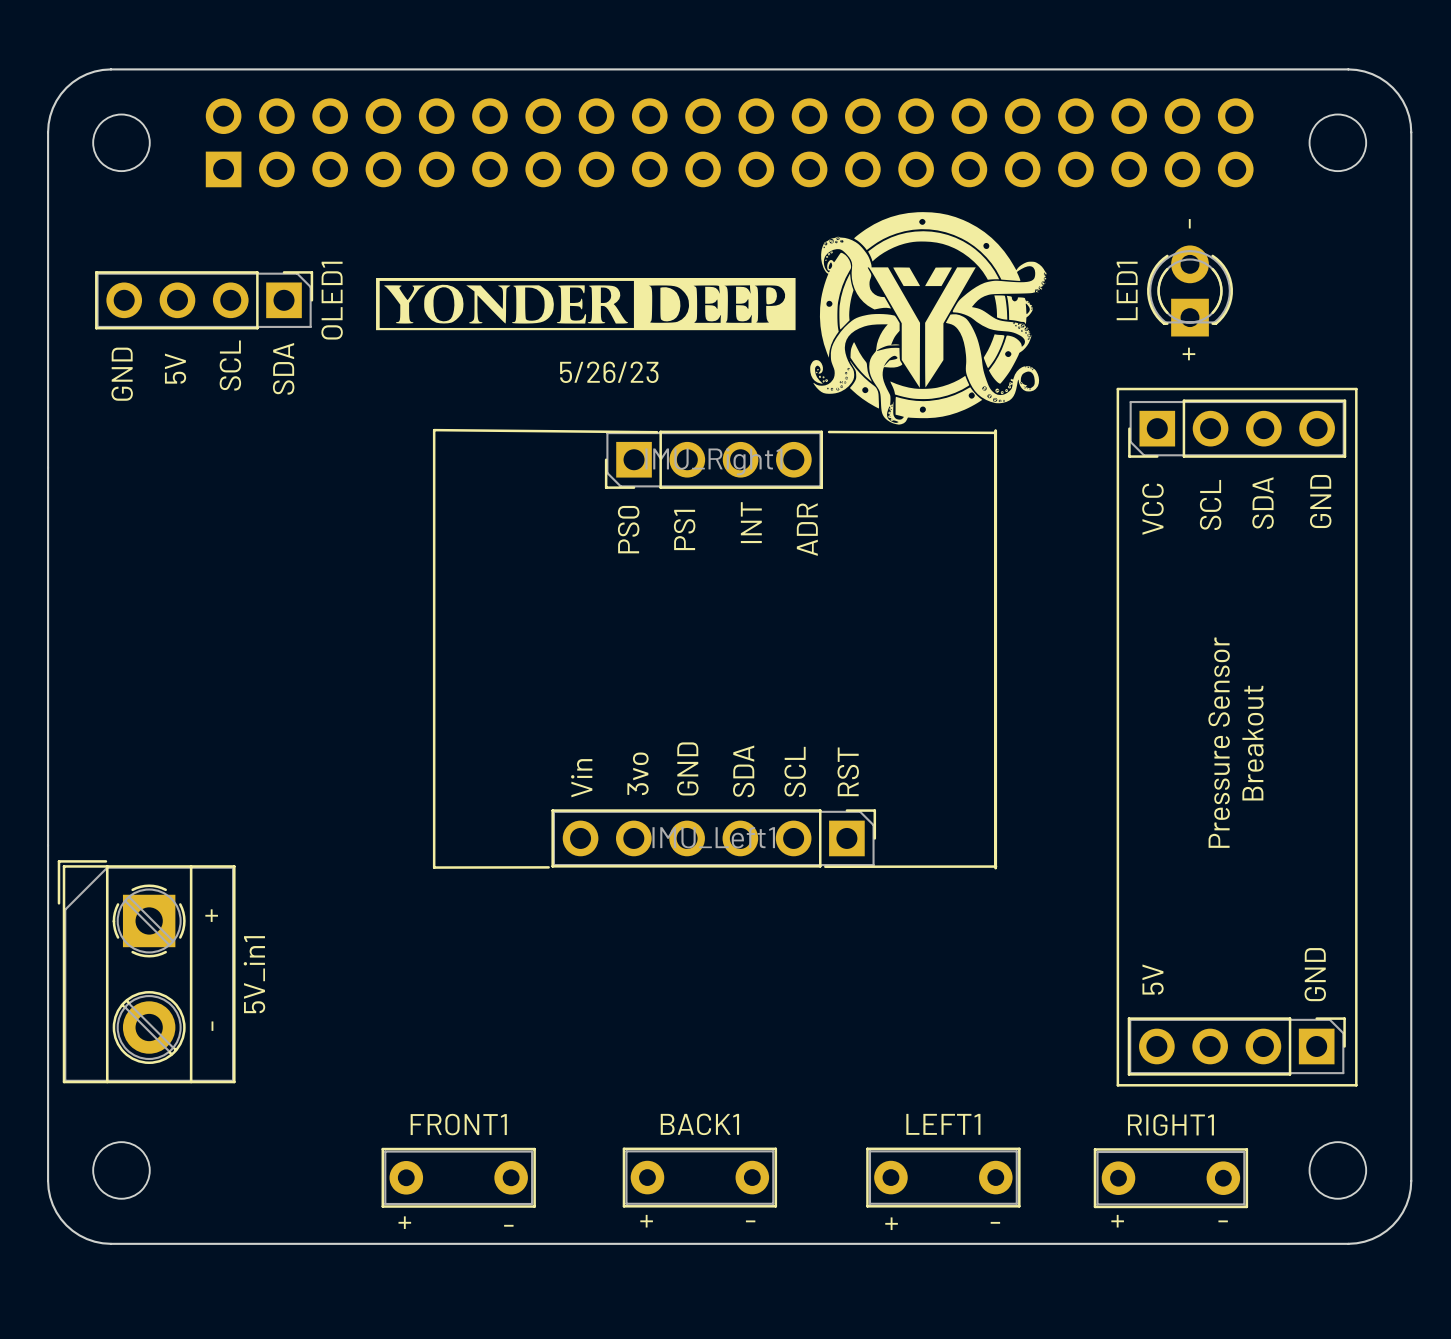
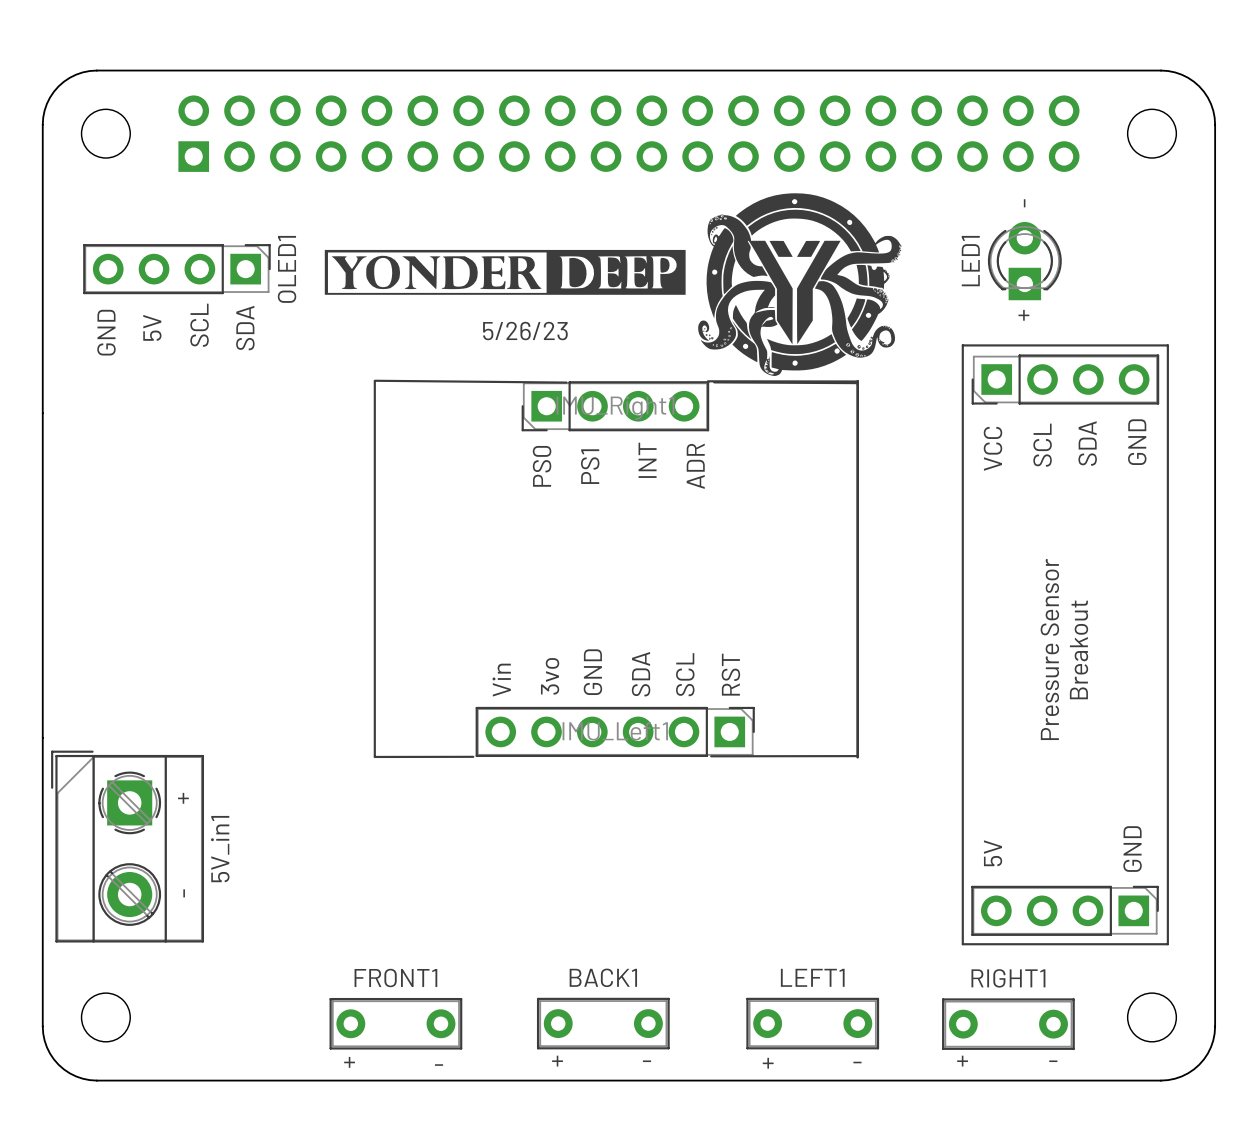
line: none -> (707, 381) (857, 381)

